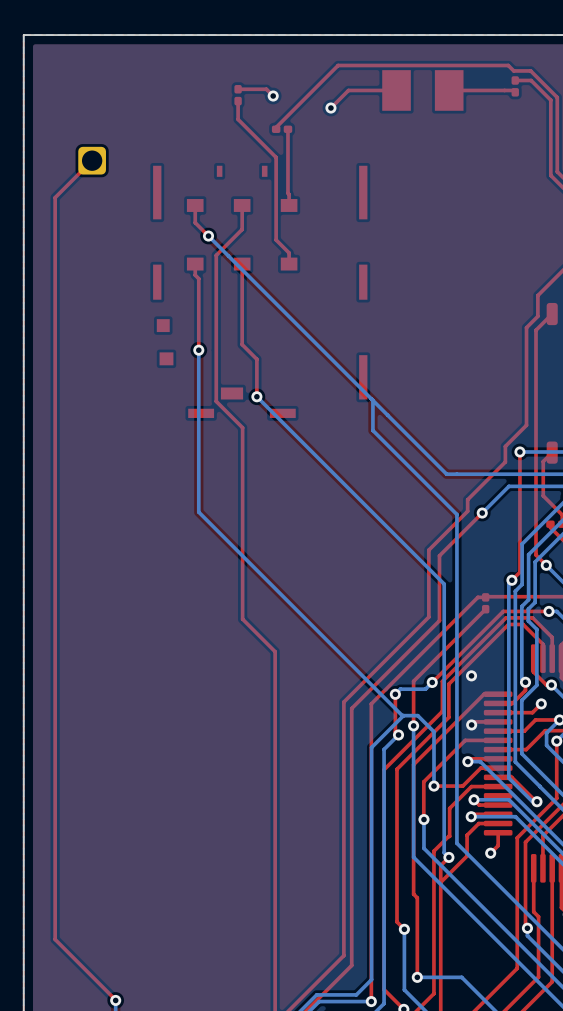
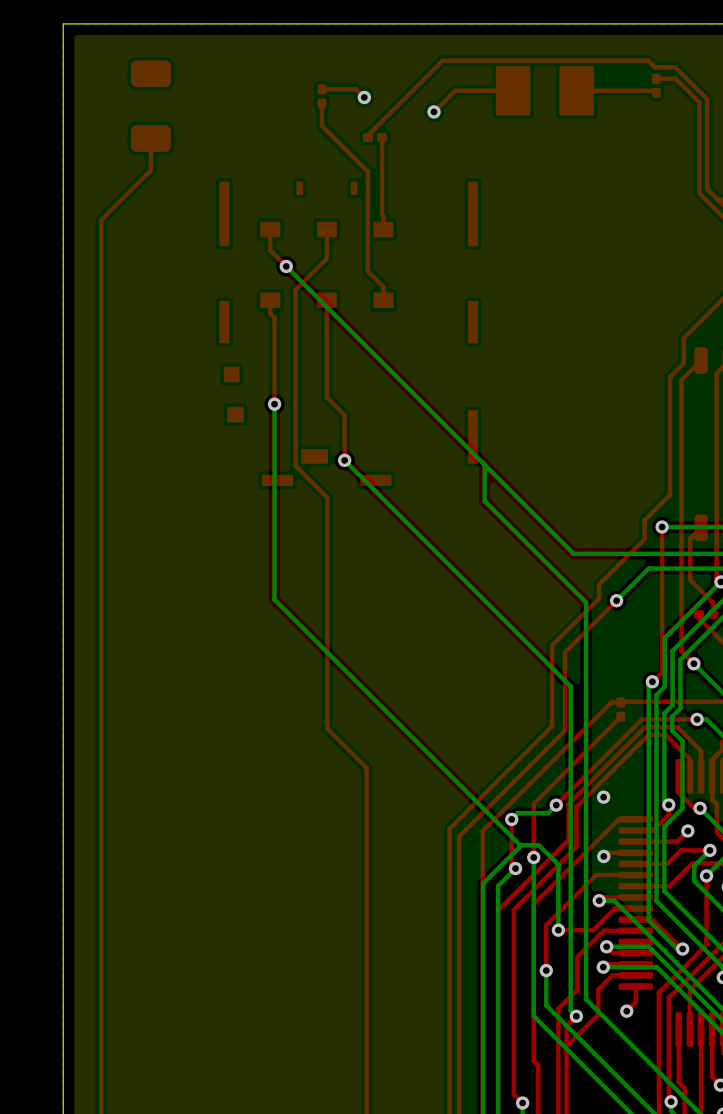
part: none -> (150, 106)
top track: none -> (150, 138) (150, 170) (145, 175)
part: (92, 160) -> none

